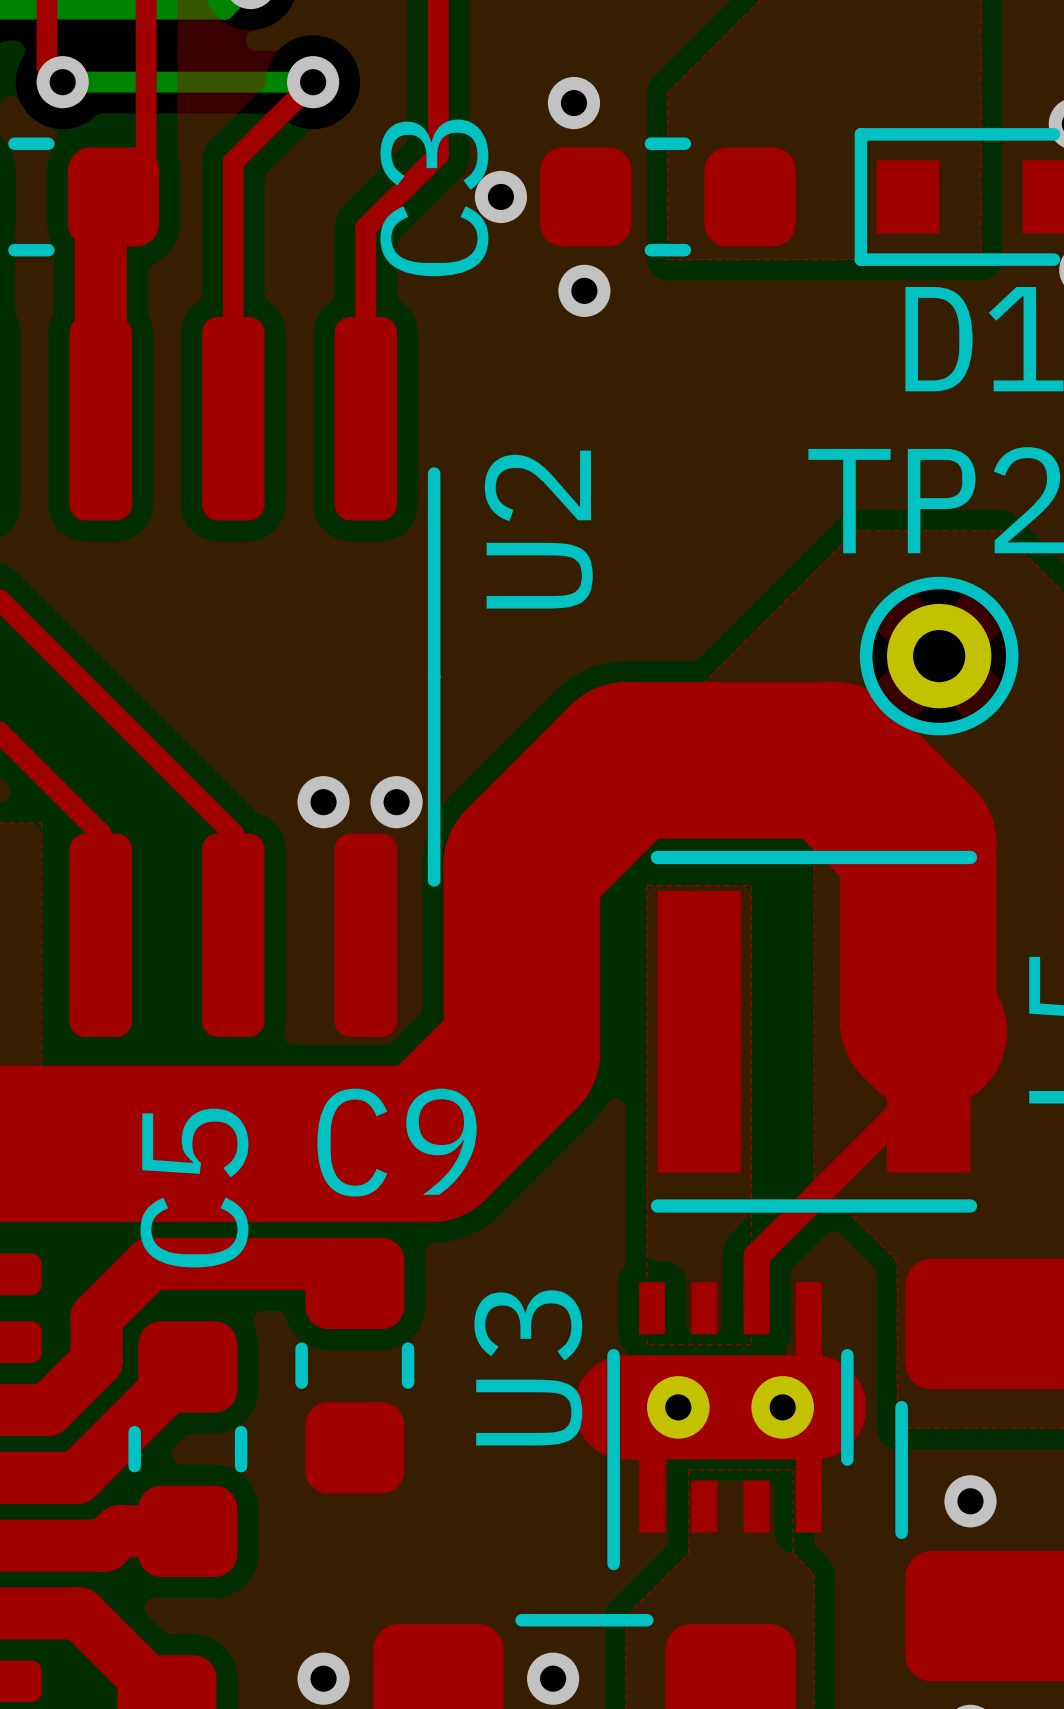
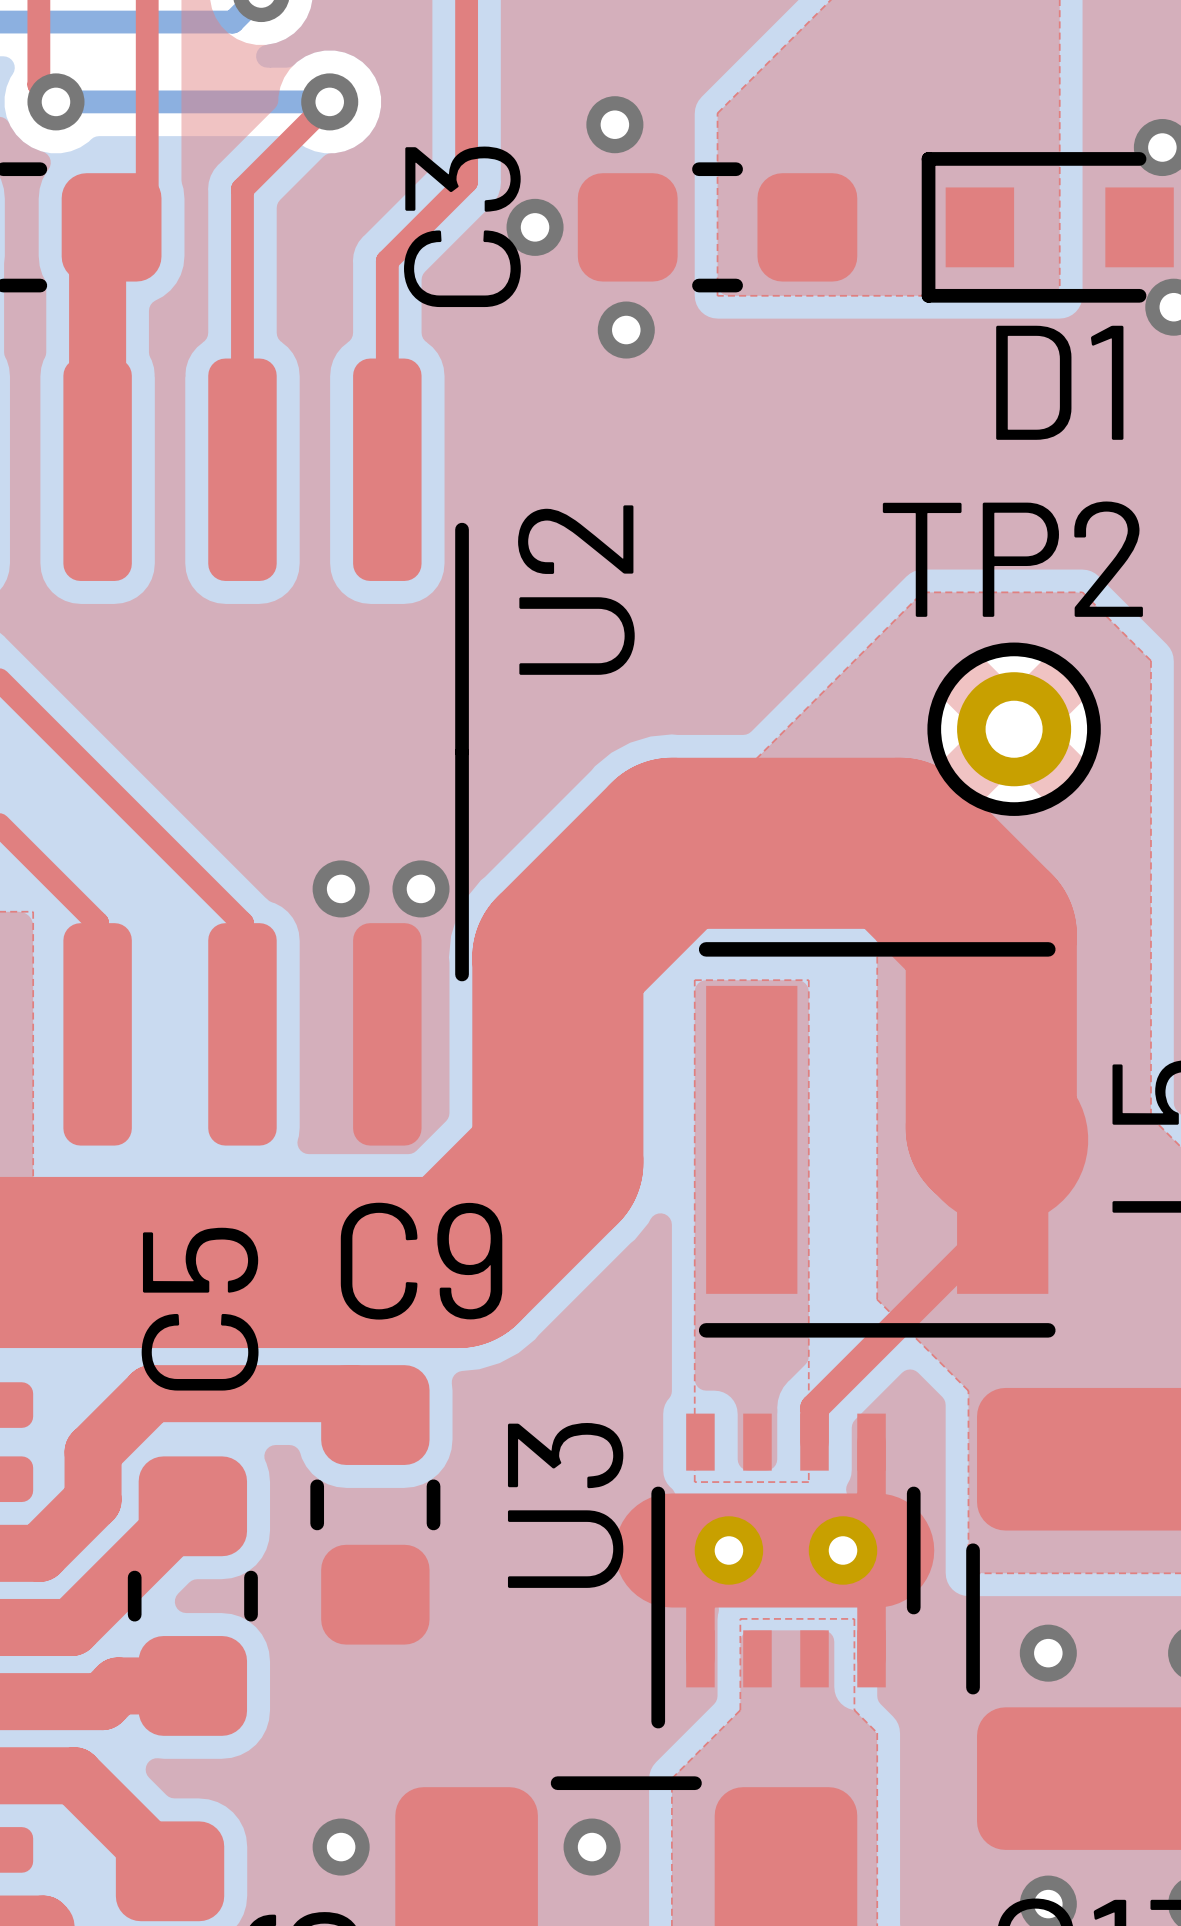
top track: (928, 1083) (756, 1256) (756, 1276) -> (1002, 1196) (1002, 1219) (814, 1407)

